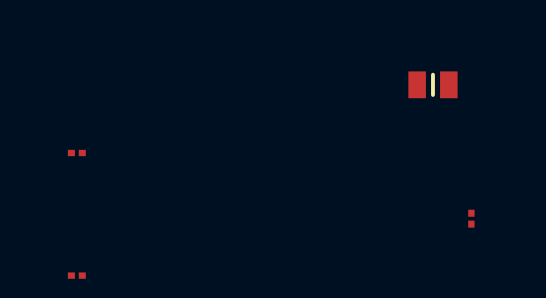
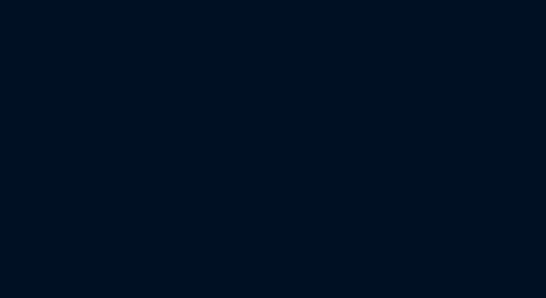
part: (432, 84) -> none
part: (76, 152) -> none
part: (471, 218) -> none
part: (76, 275) -> none

